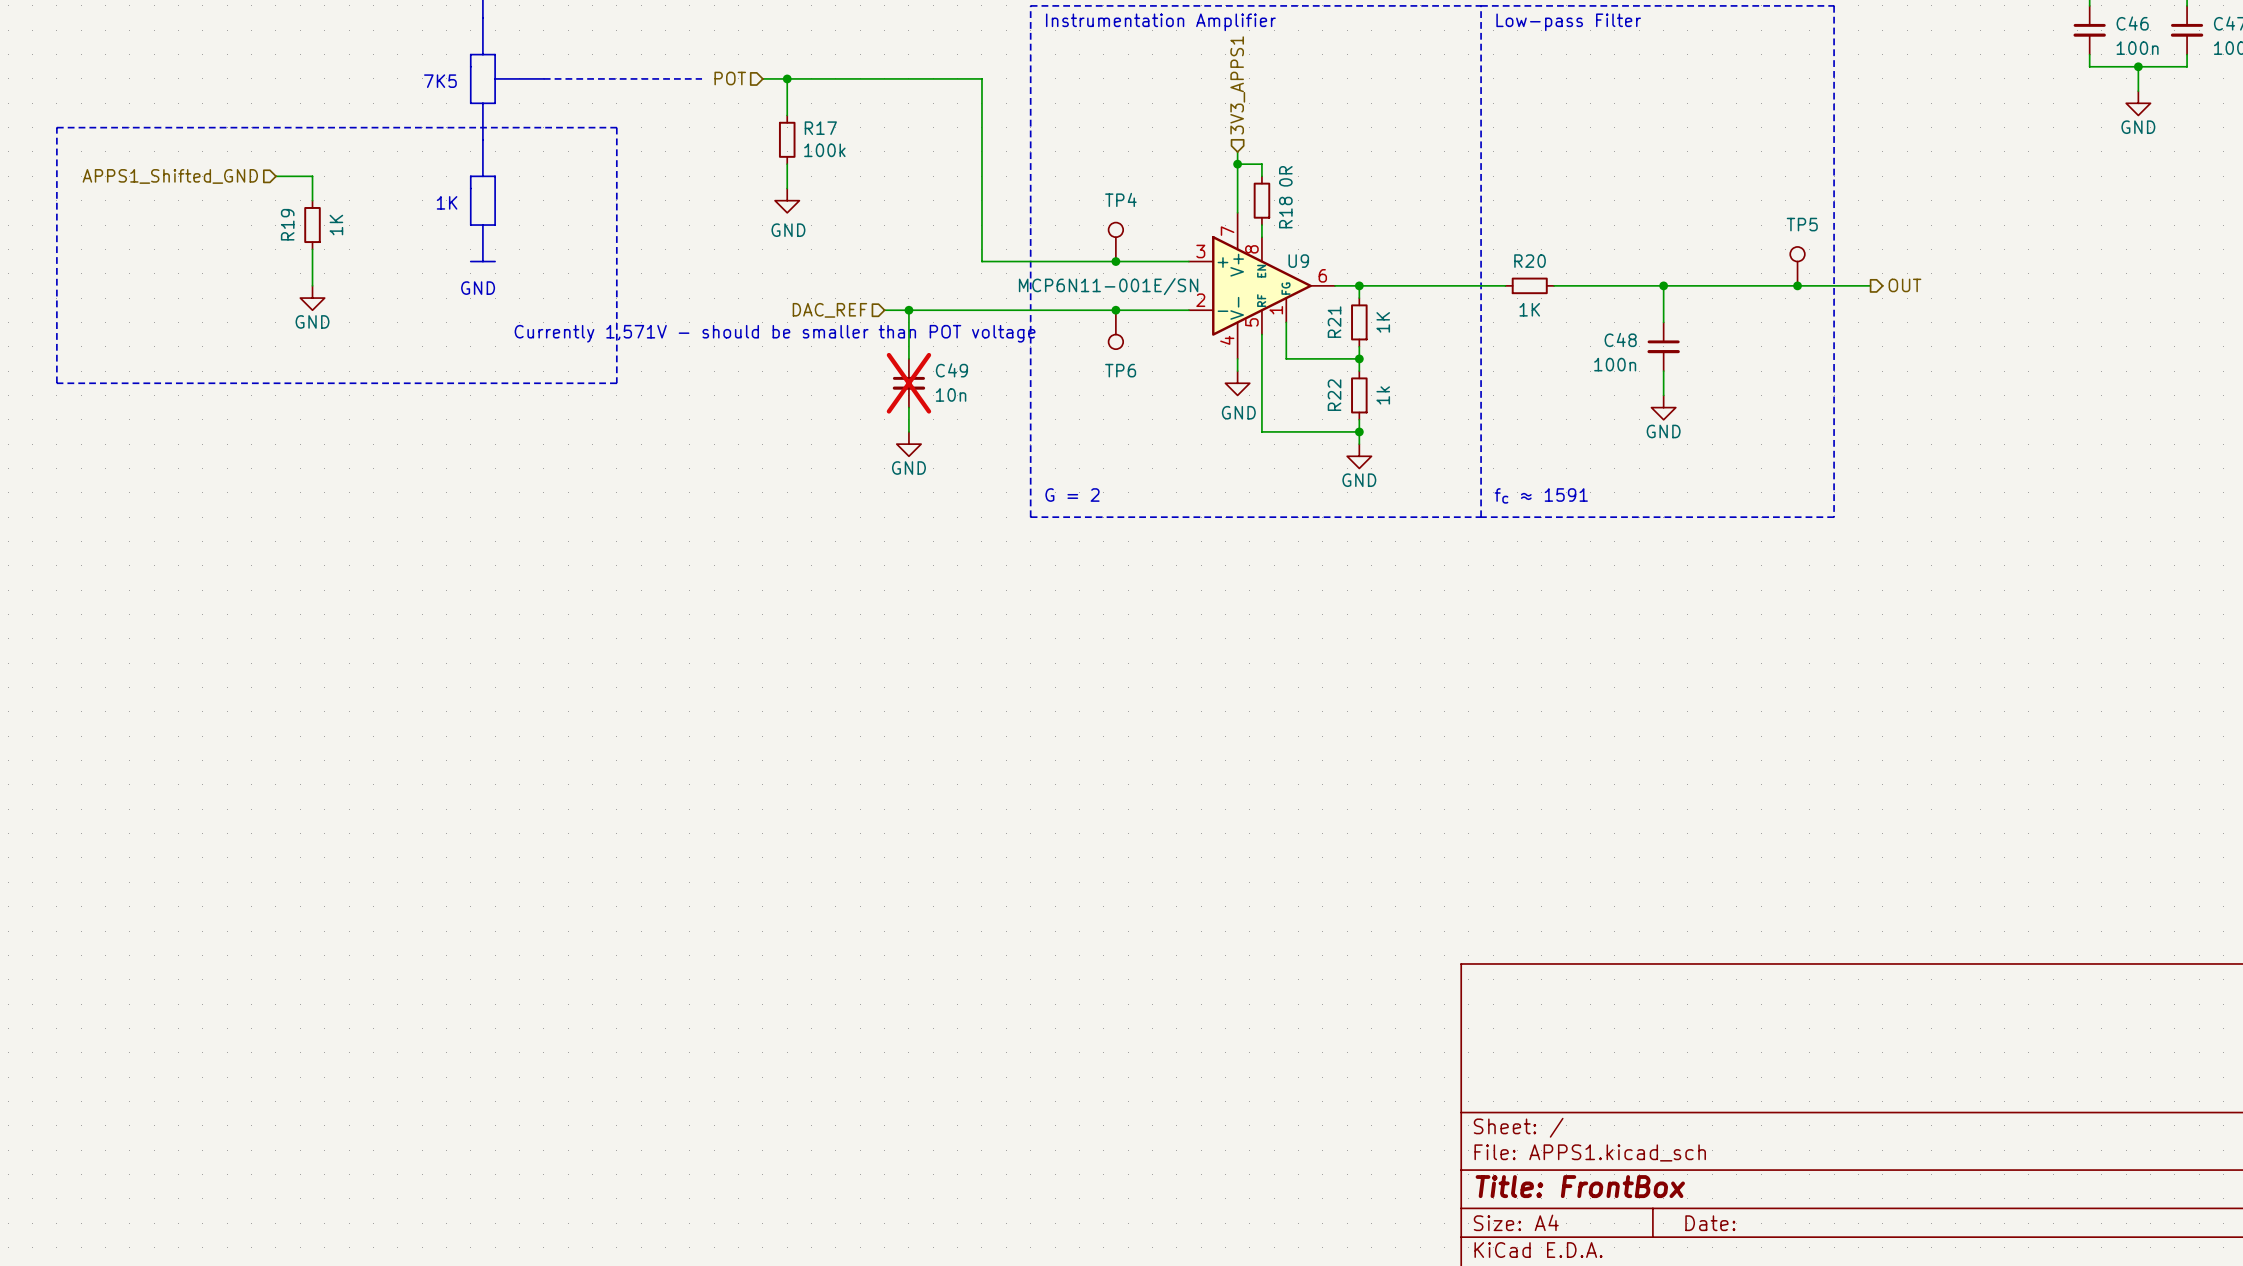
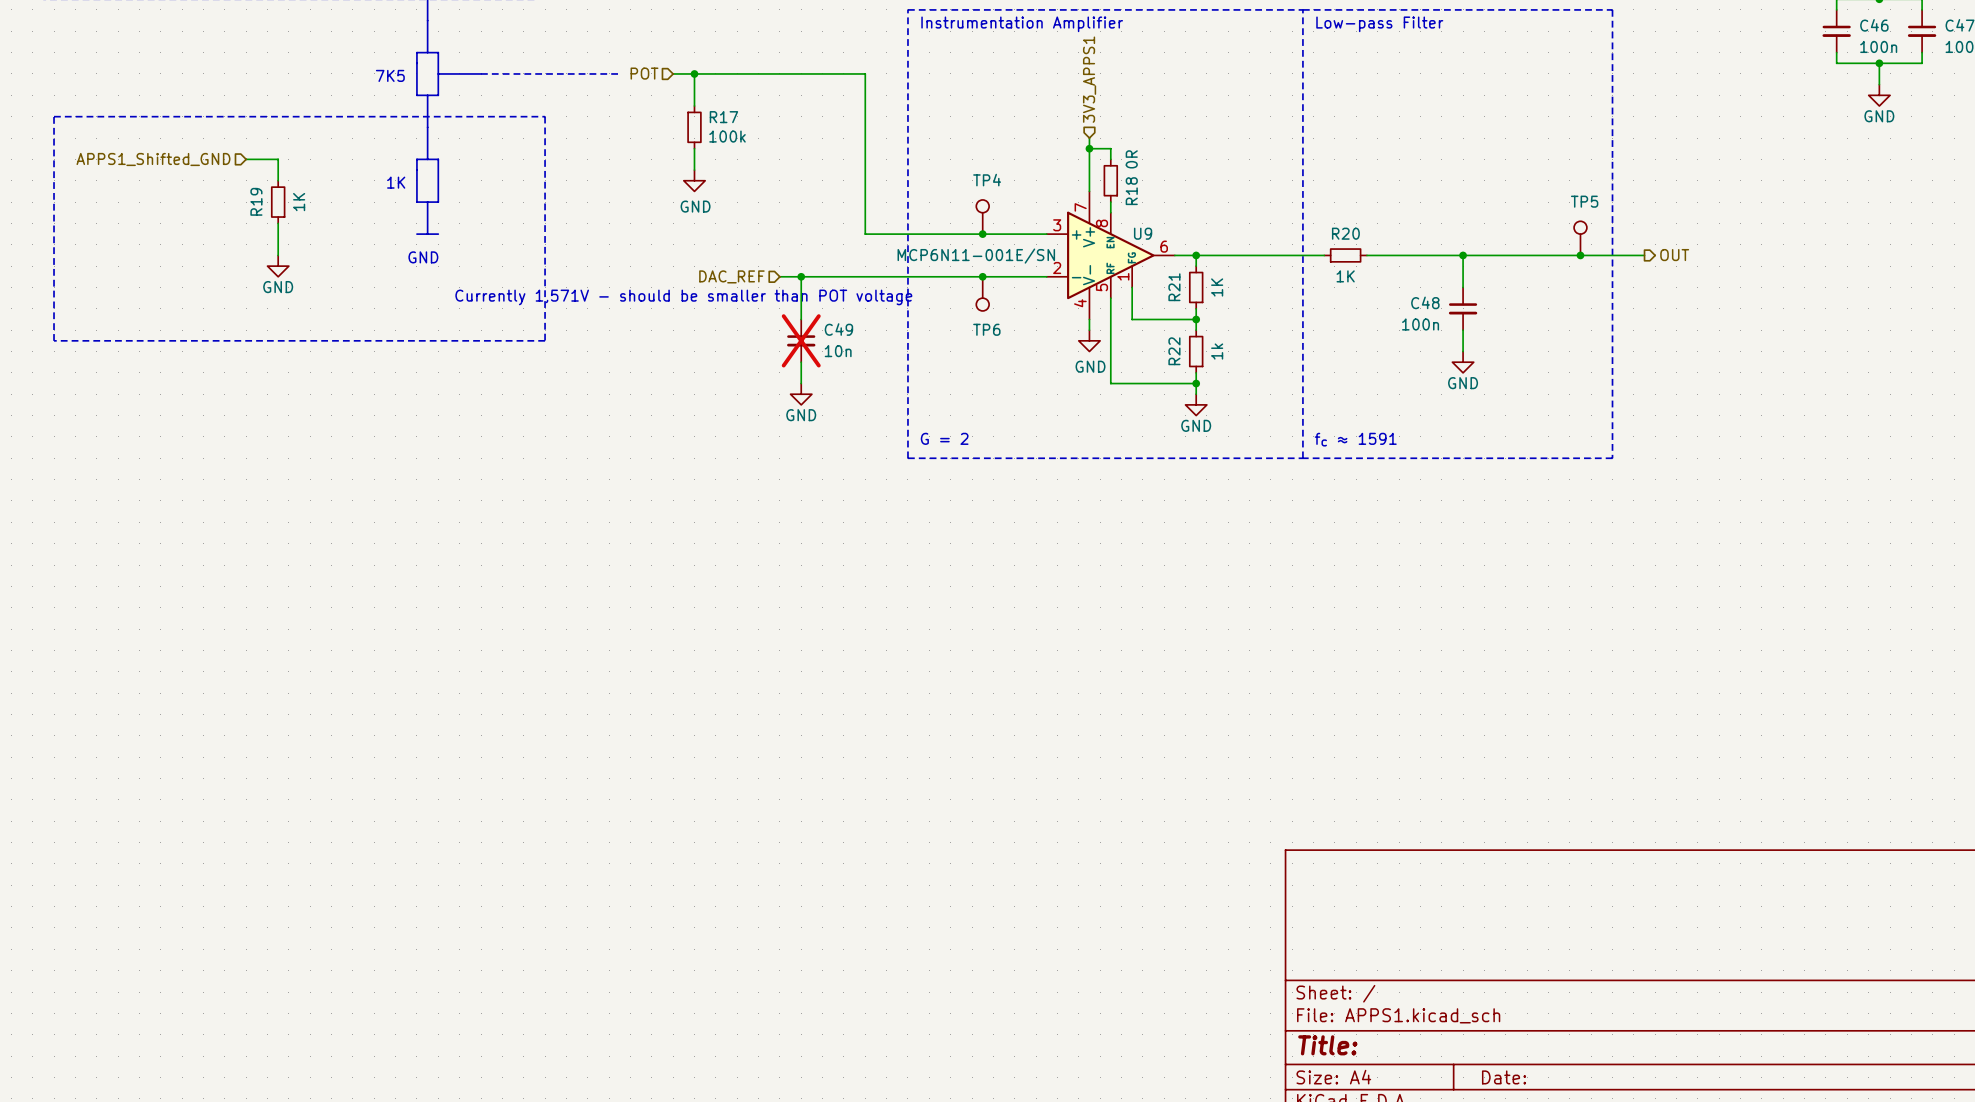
title block: Title: FrontBox (1580, 1186) -> Title: (1327, 1045)

